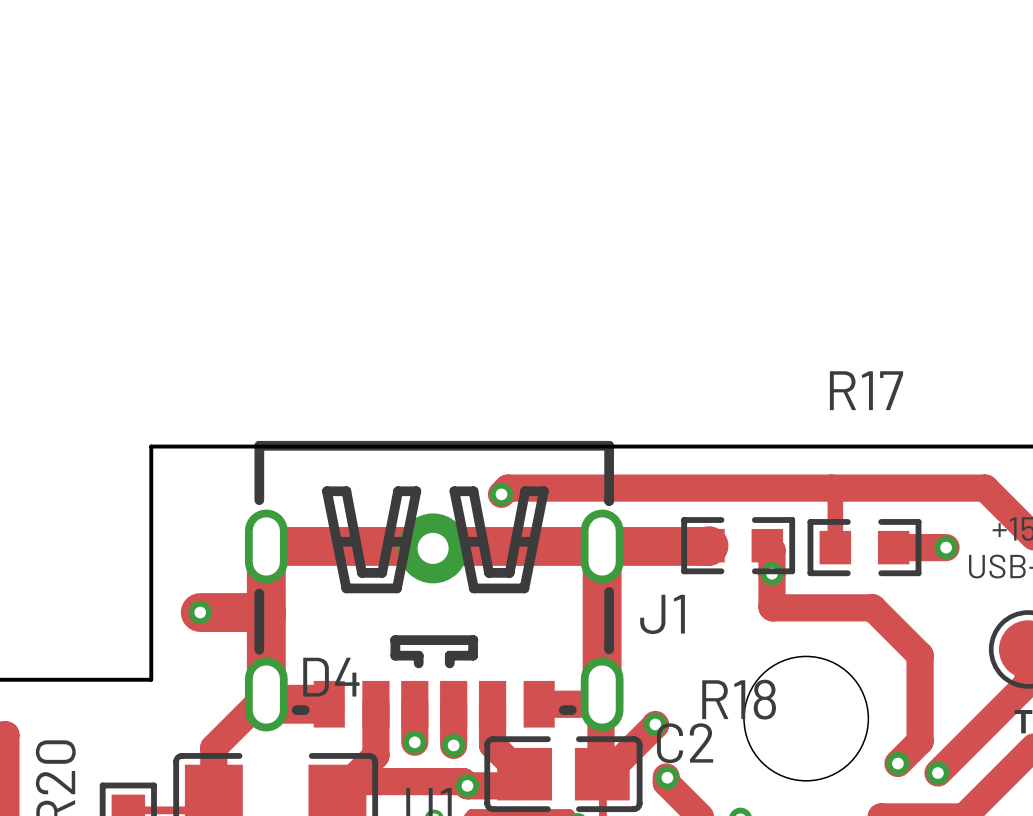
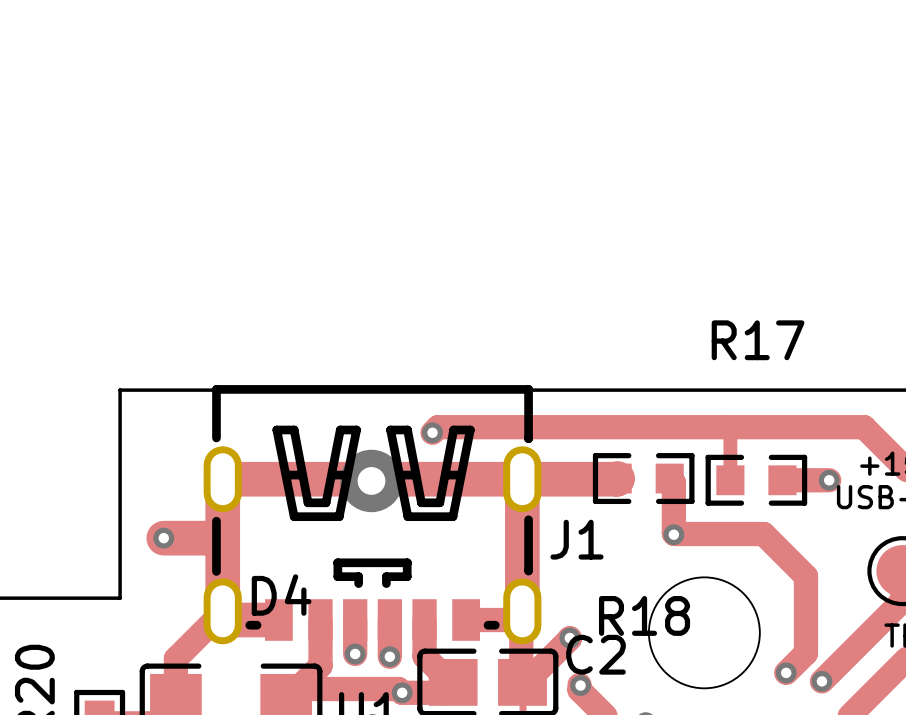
via position: (771, 573) -> (673, 534)

